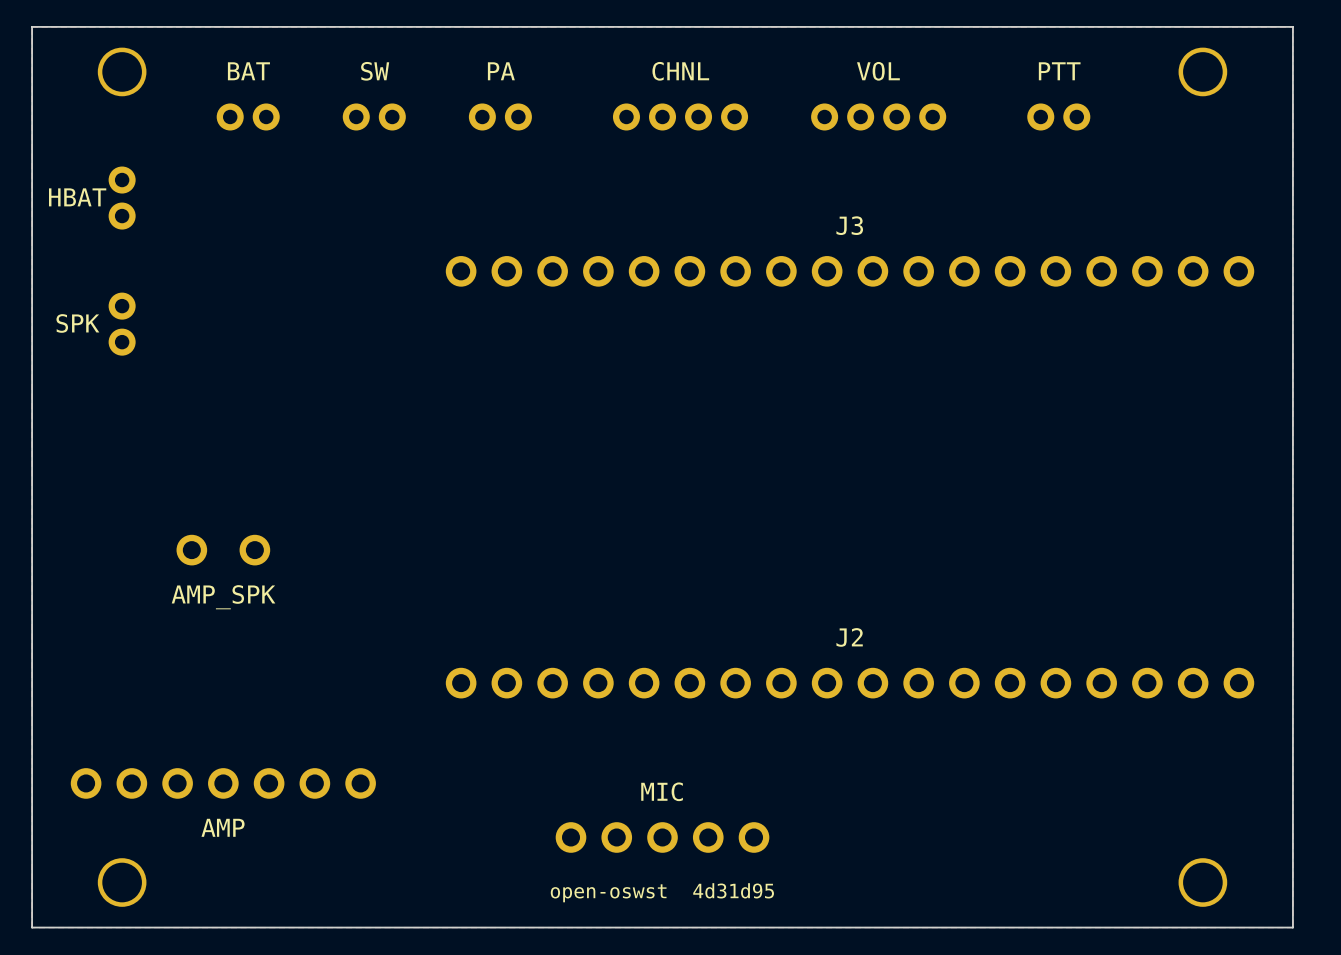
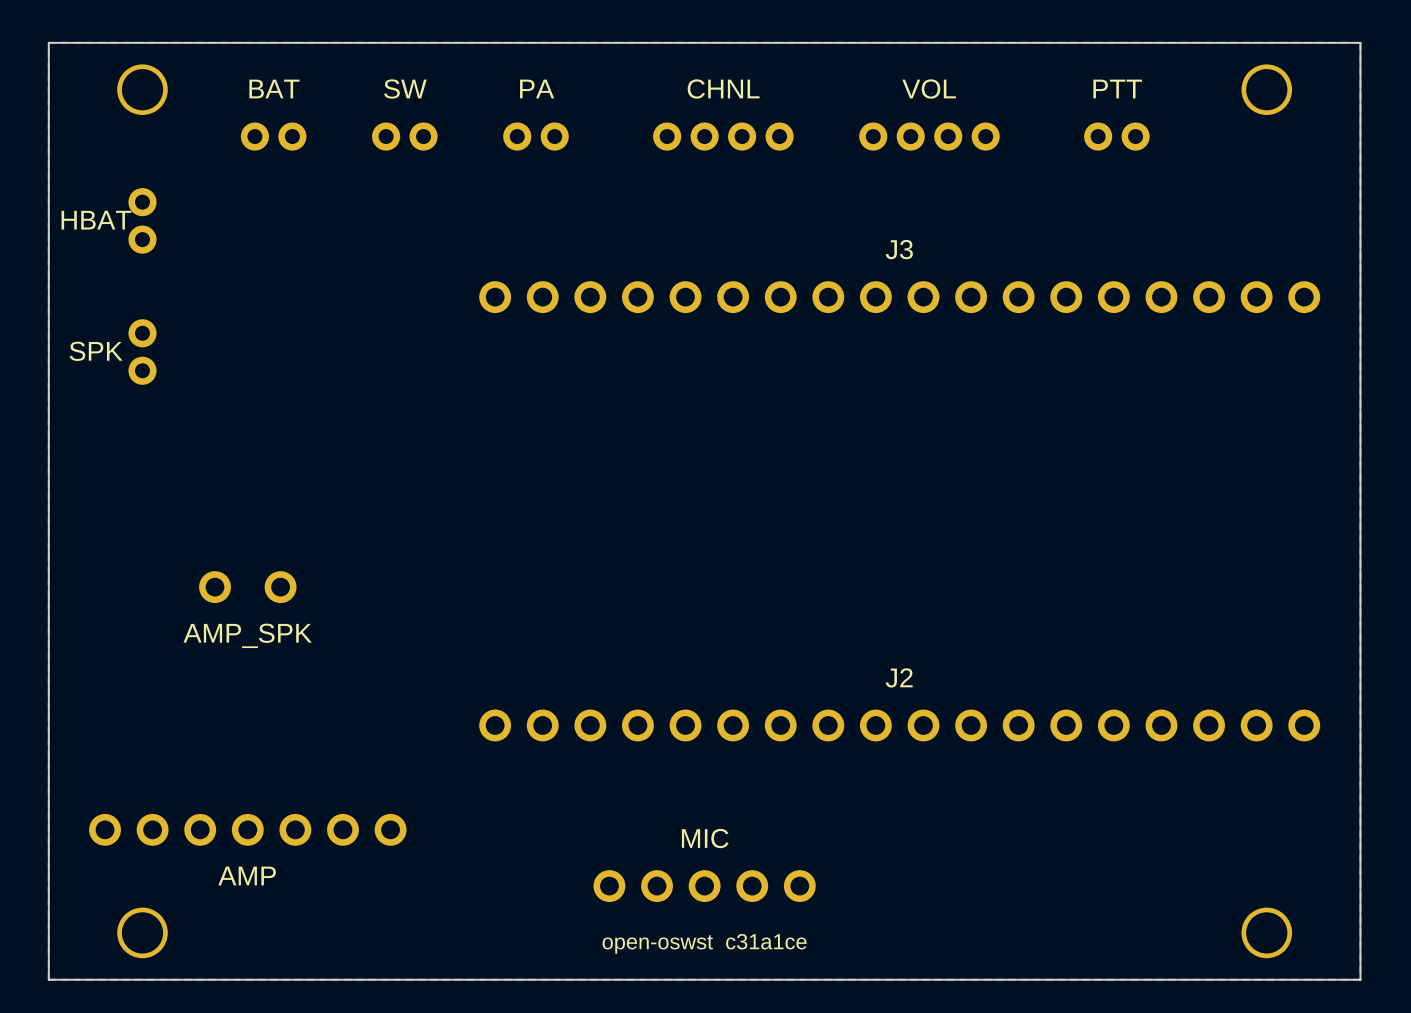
text: open-oswst 4d31d95 (662, 892) -> open-oswst c31a1ce (704, 943)

